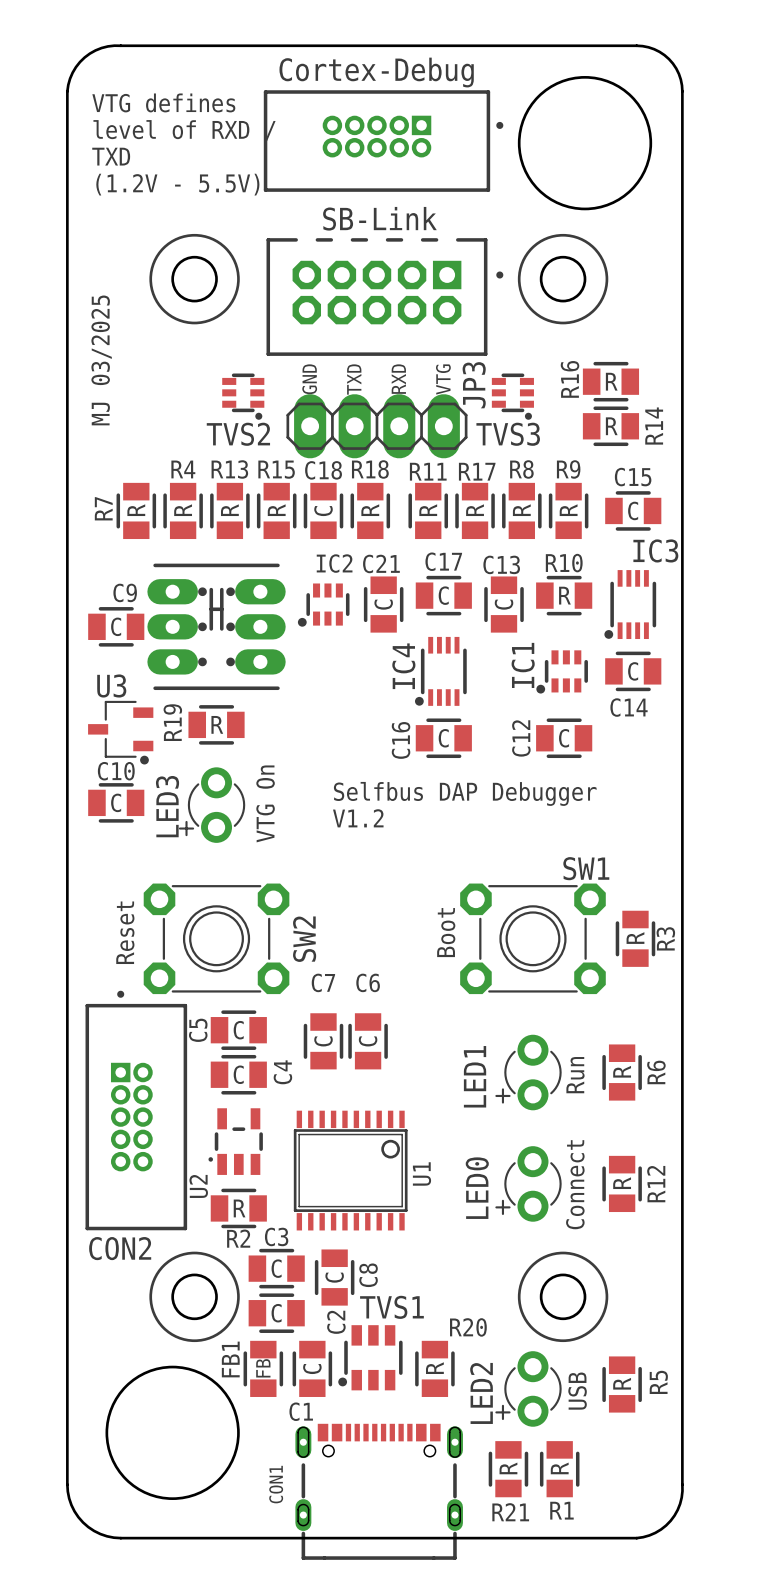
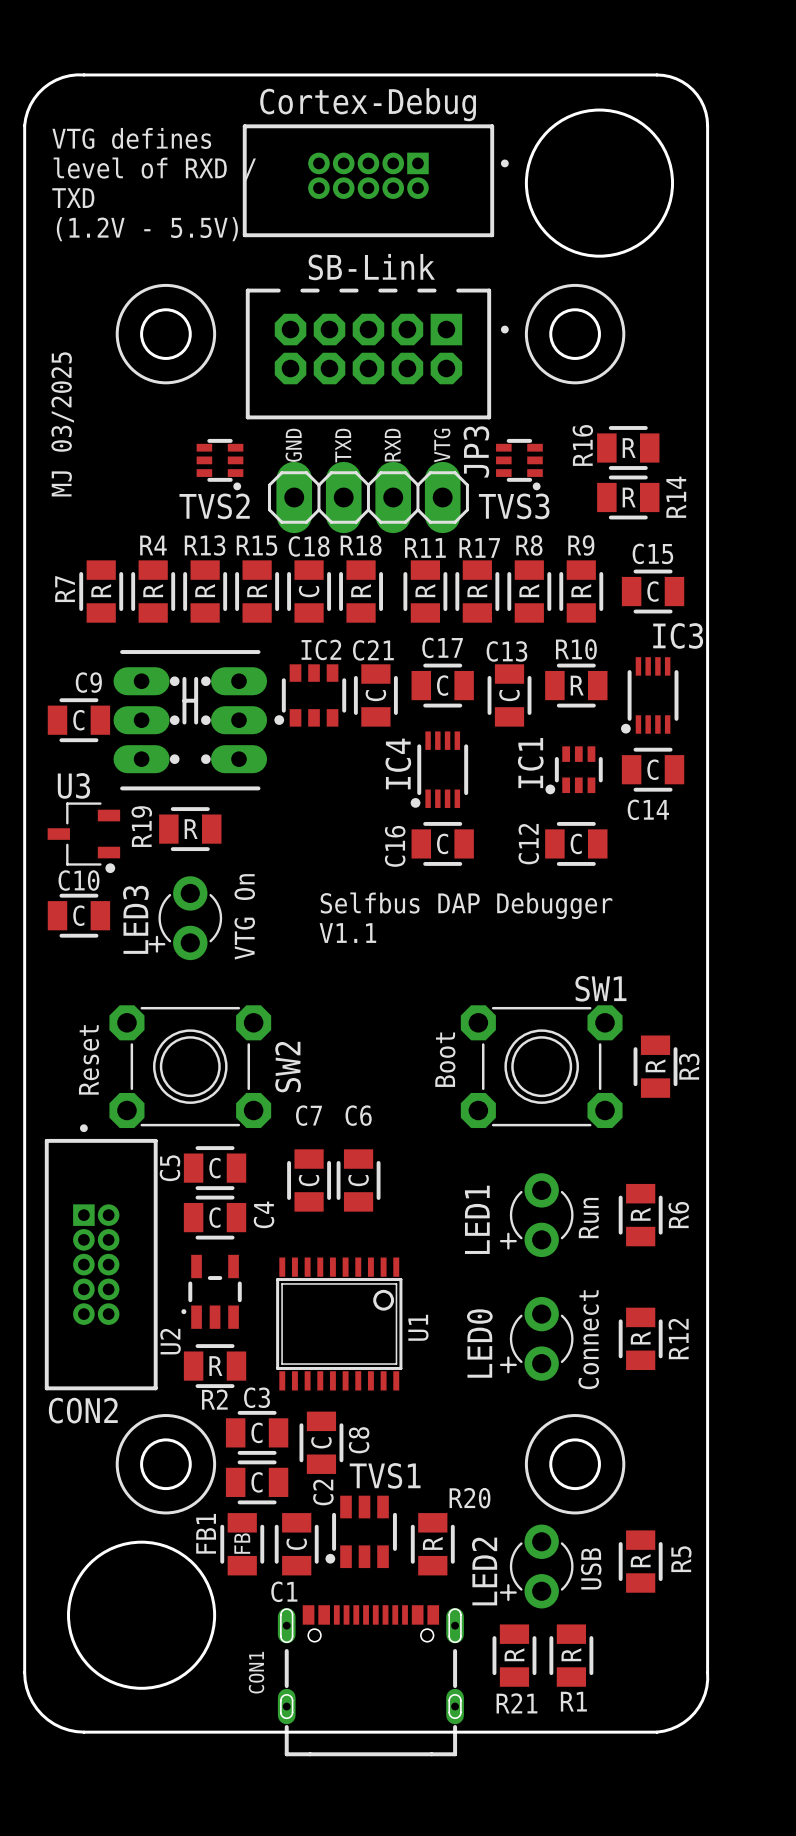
IC2 footprint: [297, 583, 350, 627] -> [274, 664, 347, 727]
text: V1.2 (358, 818) -> V1.1 (347, 933)

